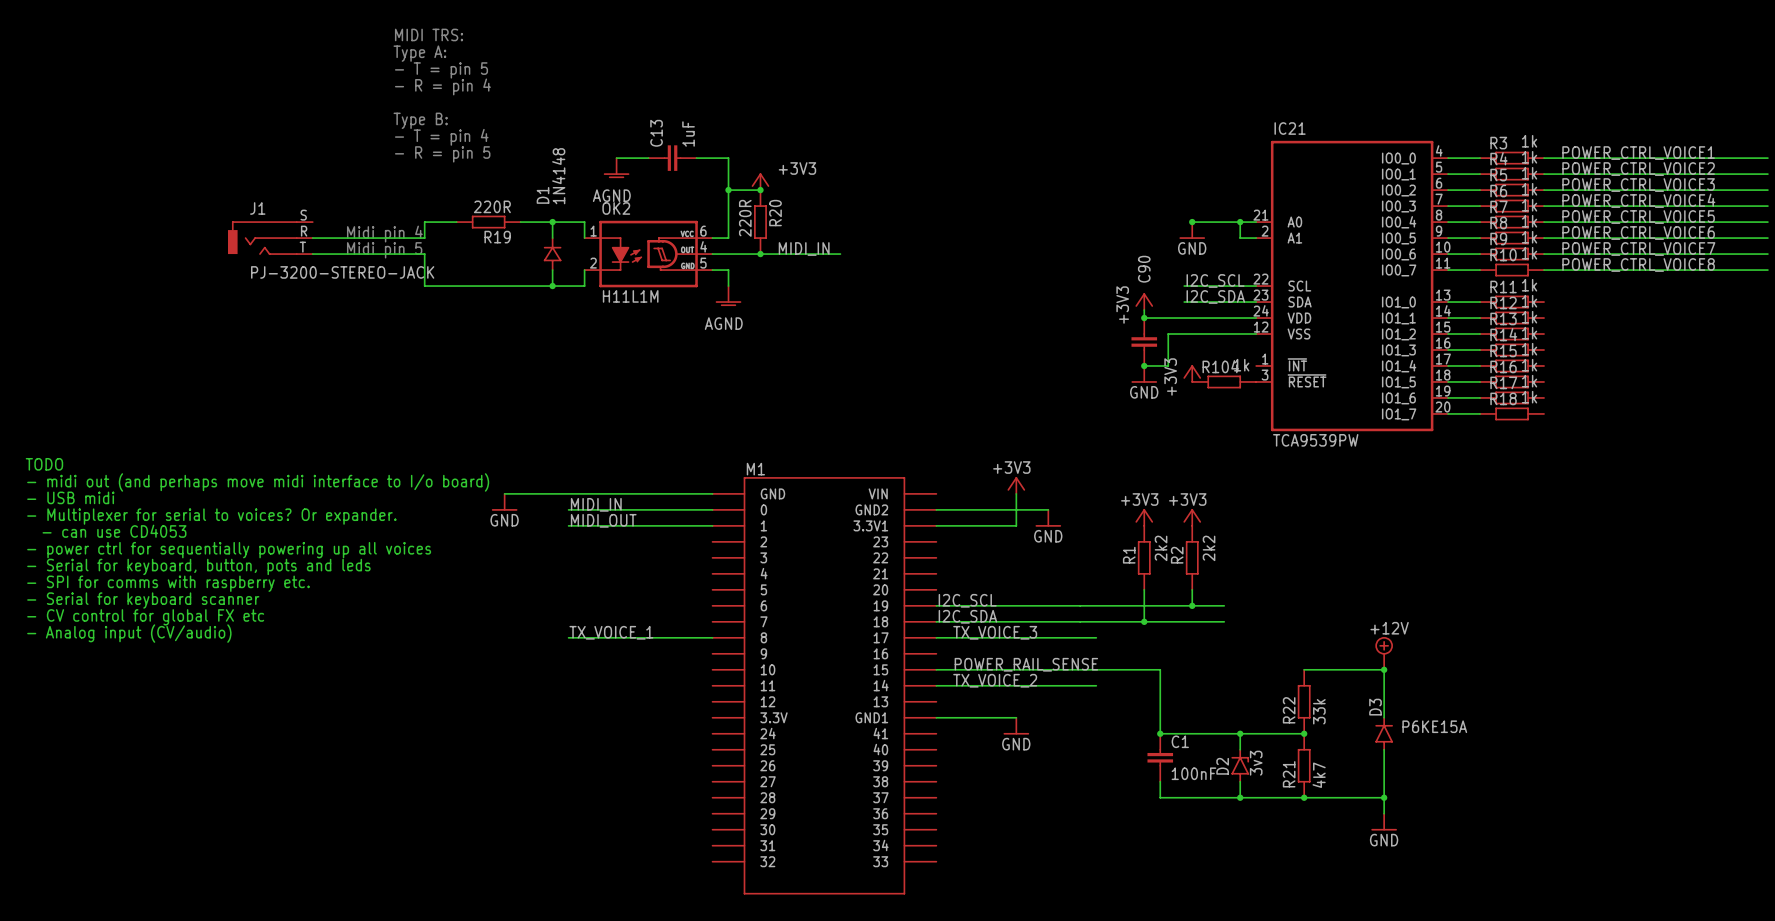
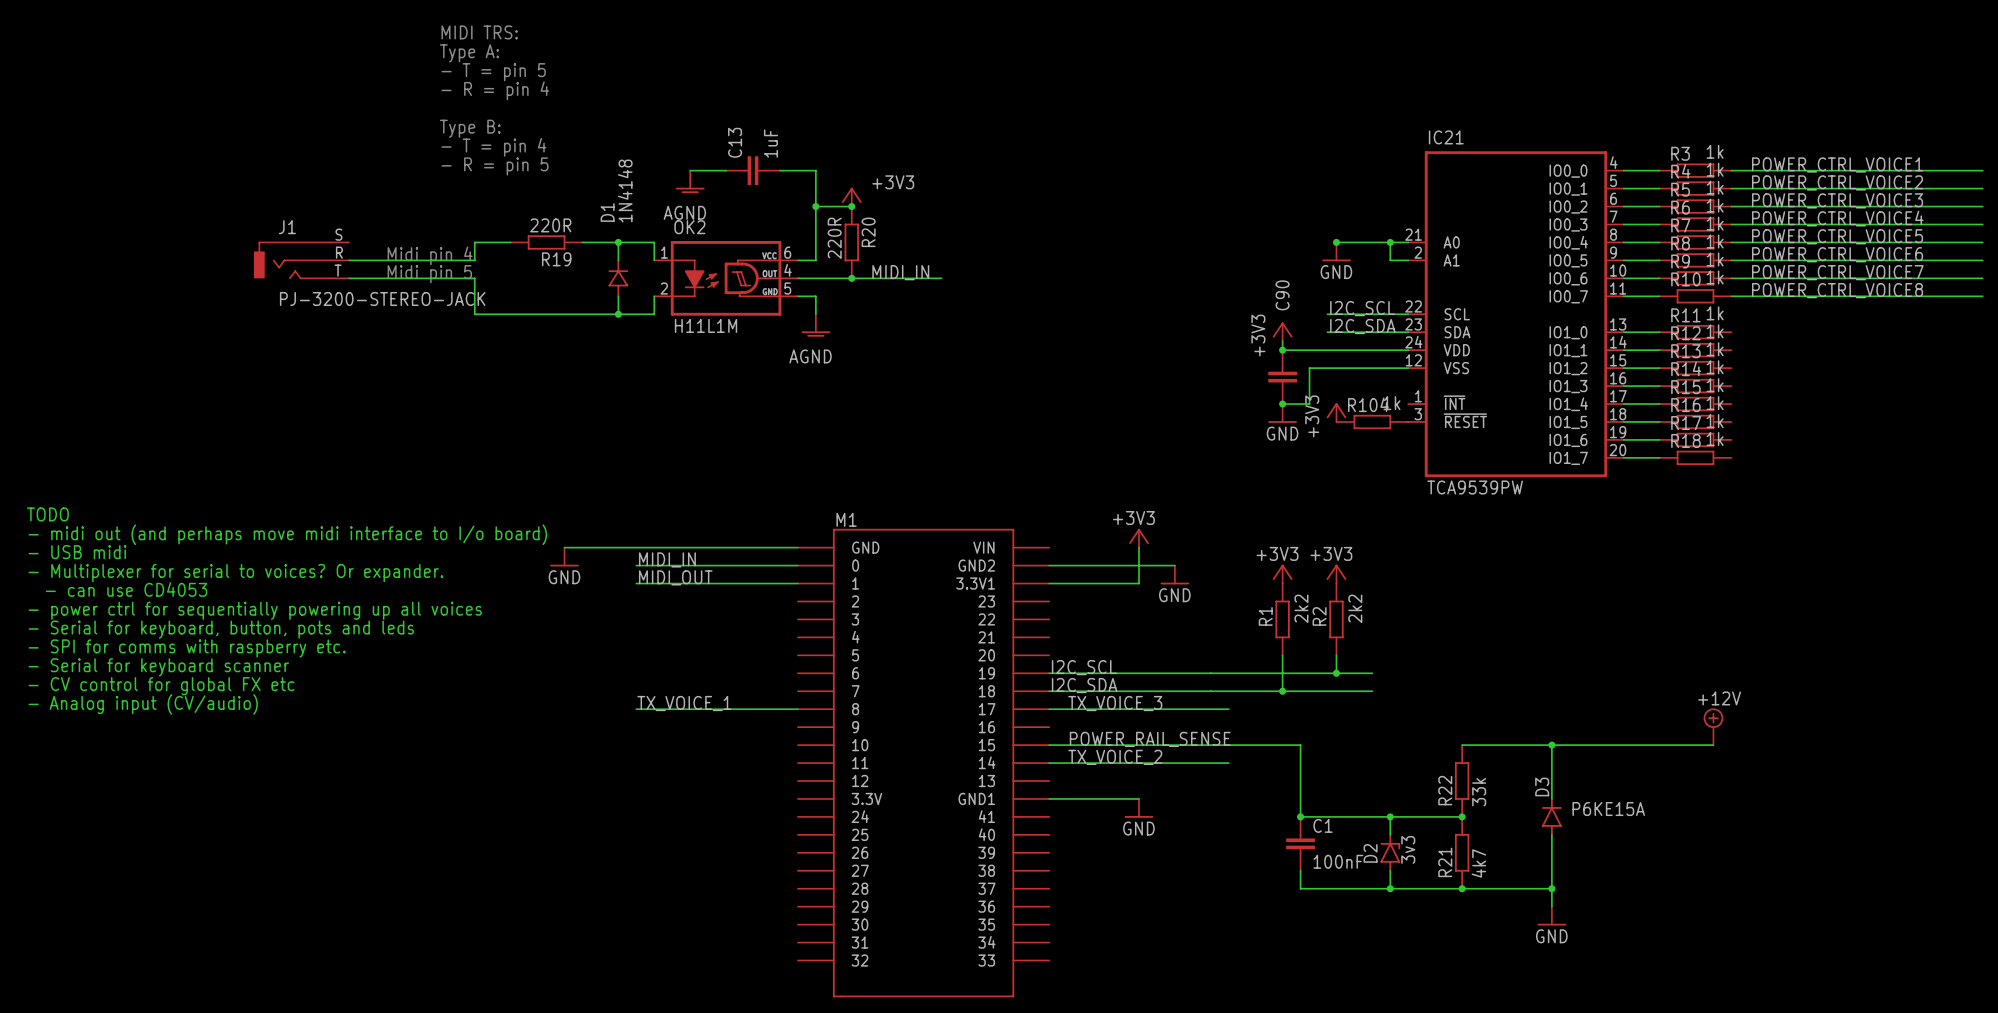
power symbol position: +12V (1384, 653) -> +12V (1713, 726)
wire: none -> (1551, 745) (1713, 745)

